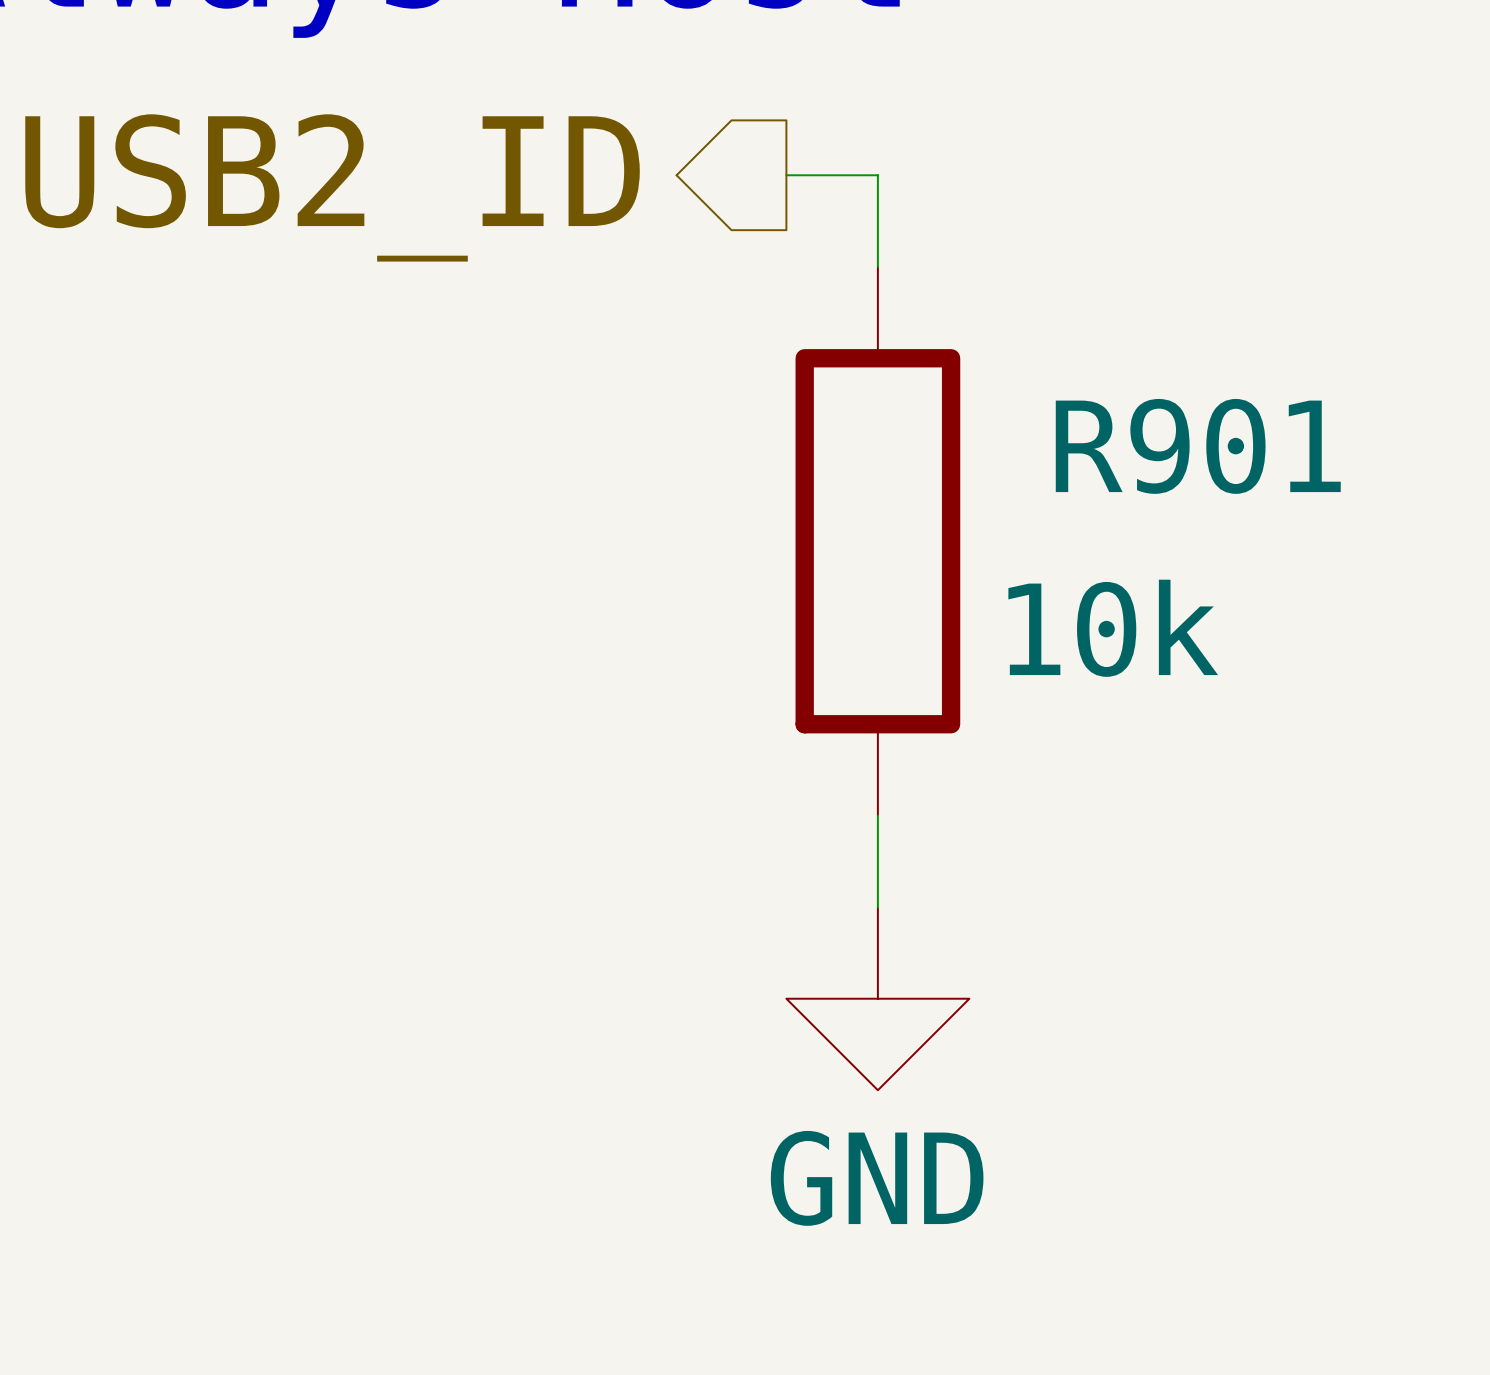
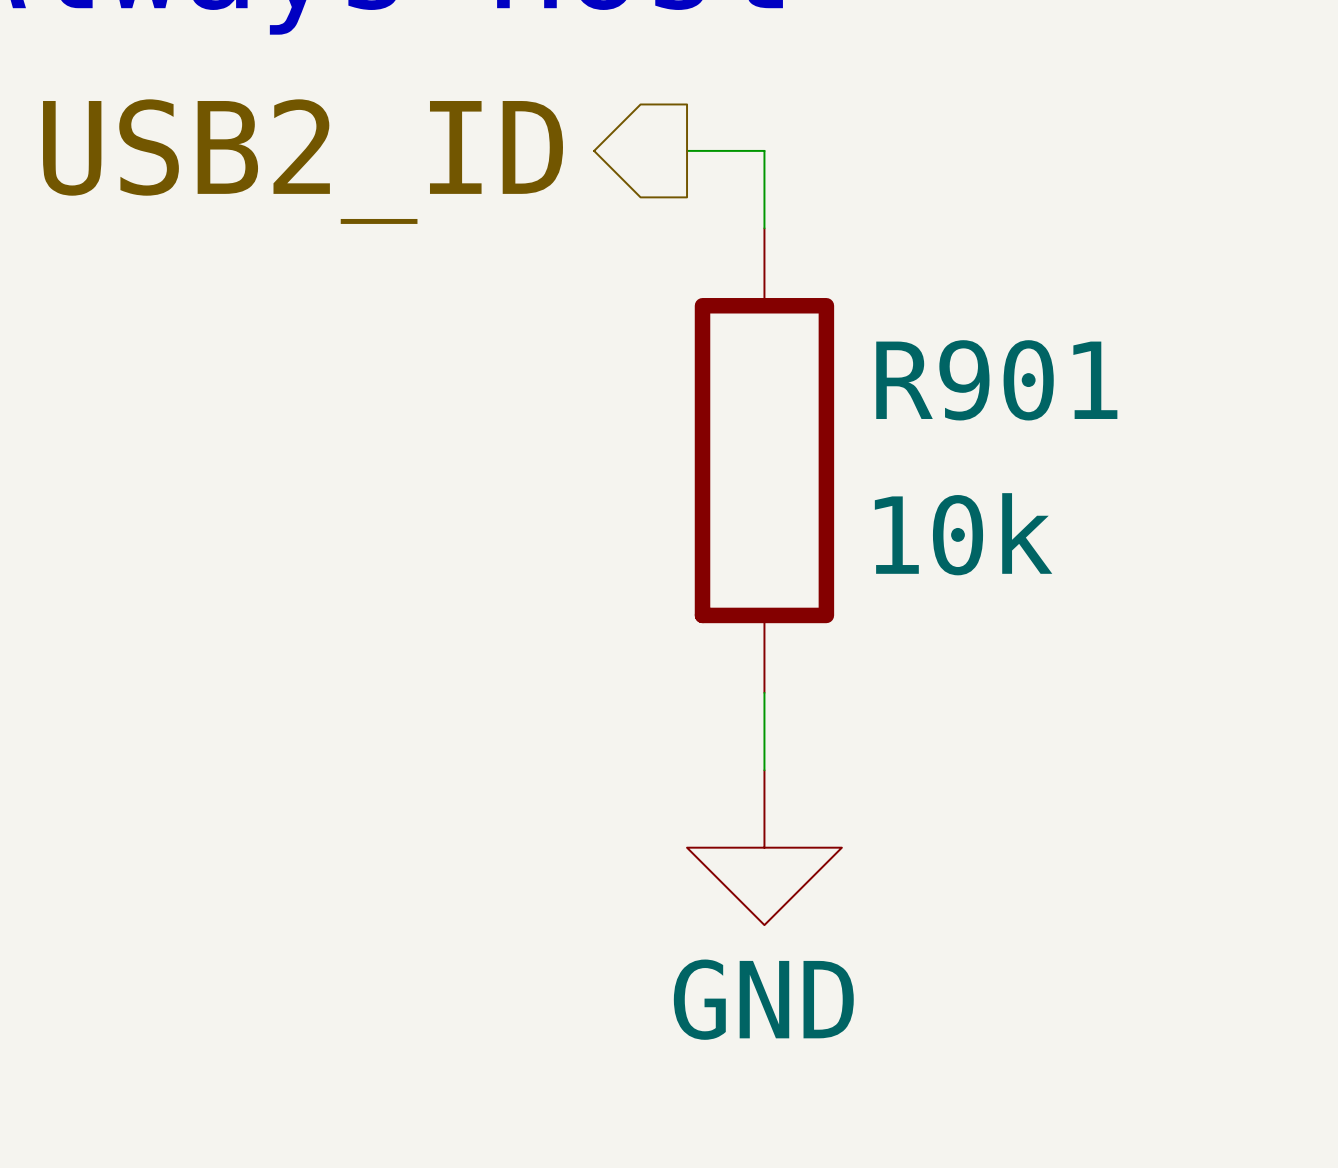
R901 name position: R901 (1198, 446) -> R901 (996, 380)

